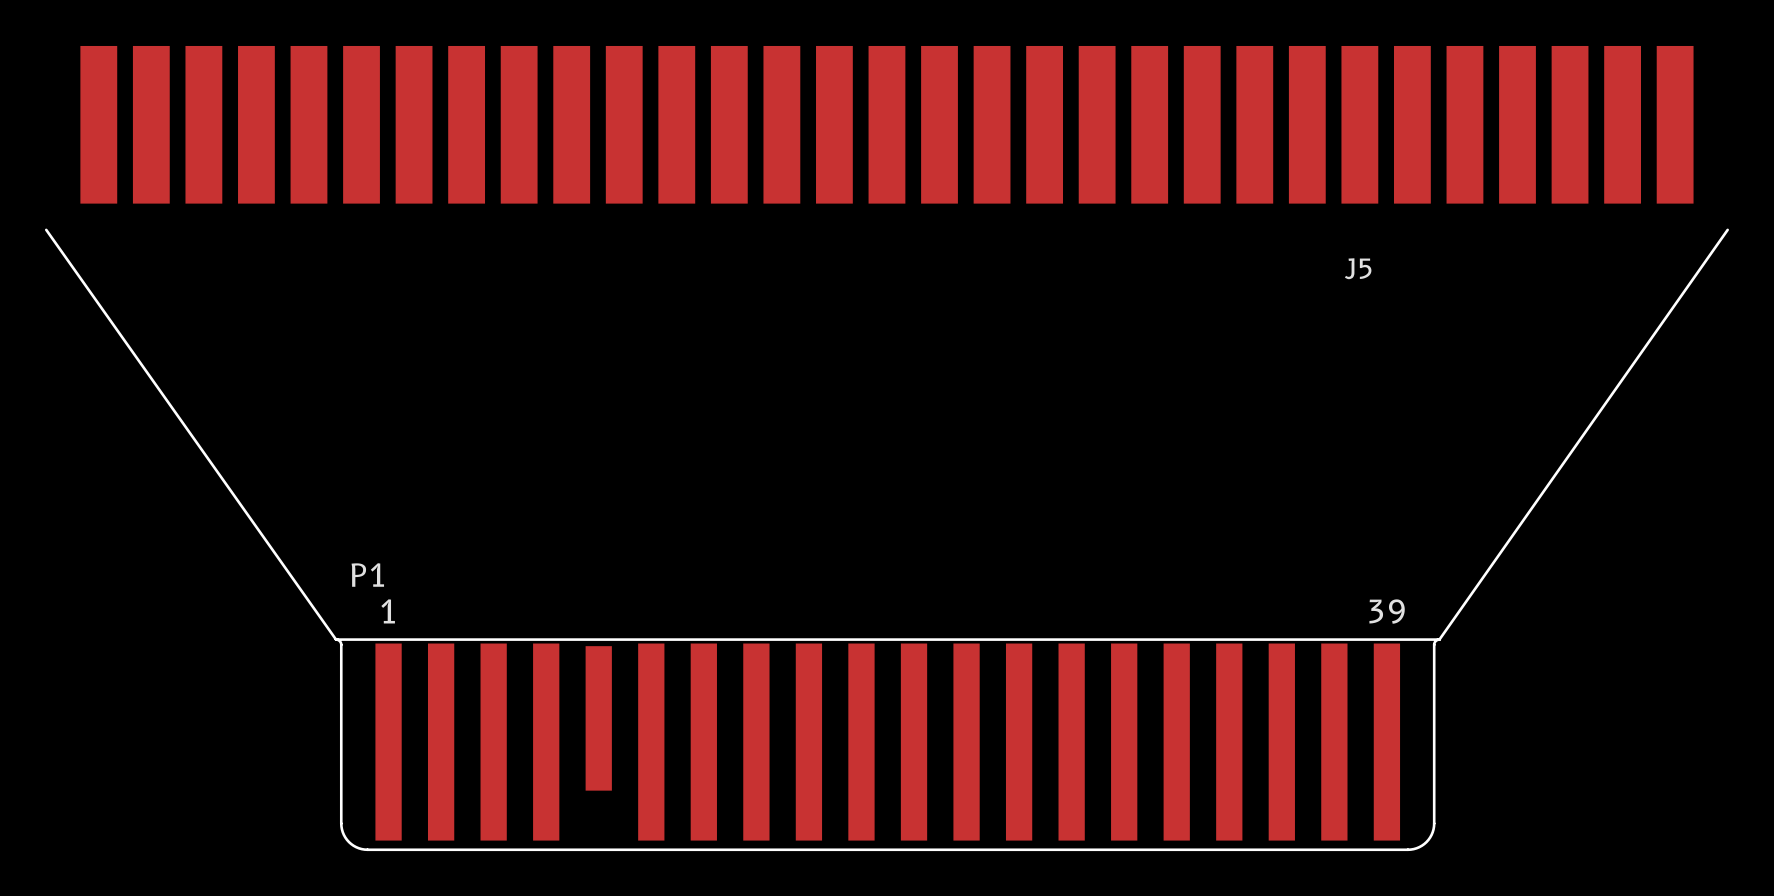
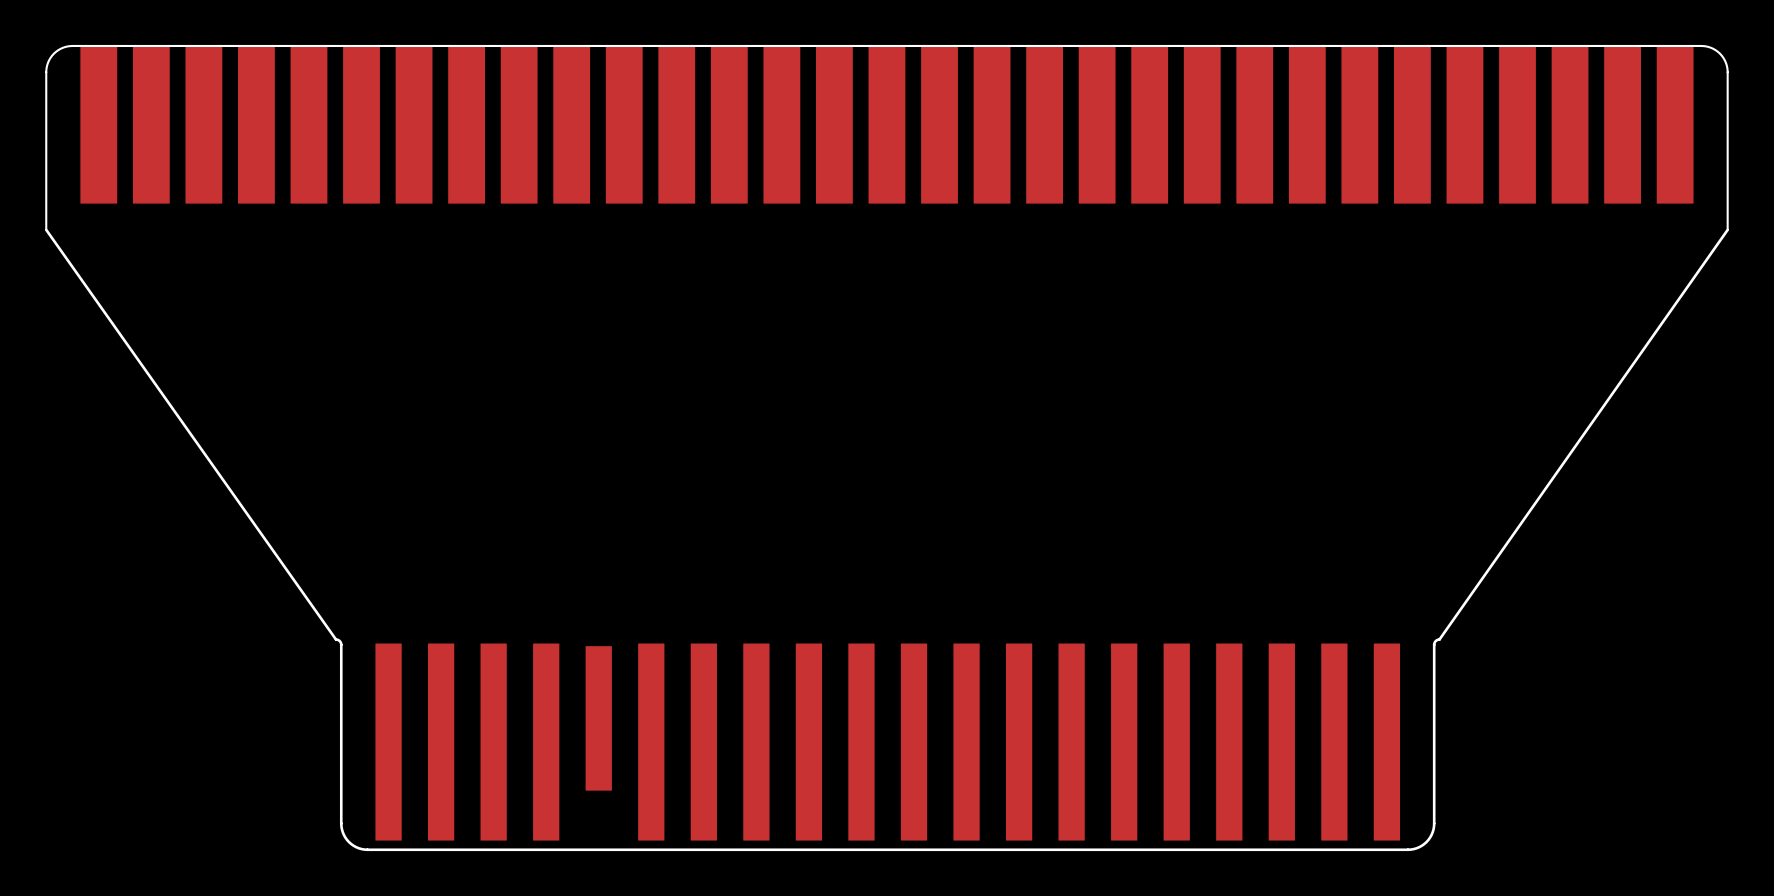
J5: (886, 124) -> none
part: none -> (886, 137)
P1: (887, 744) -> none
part: none -> (887, 744)

